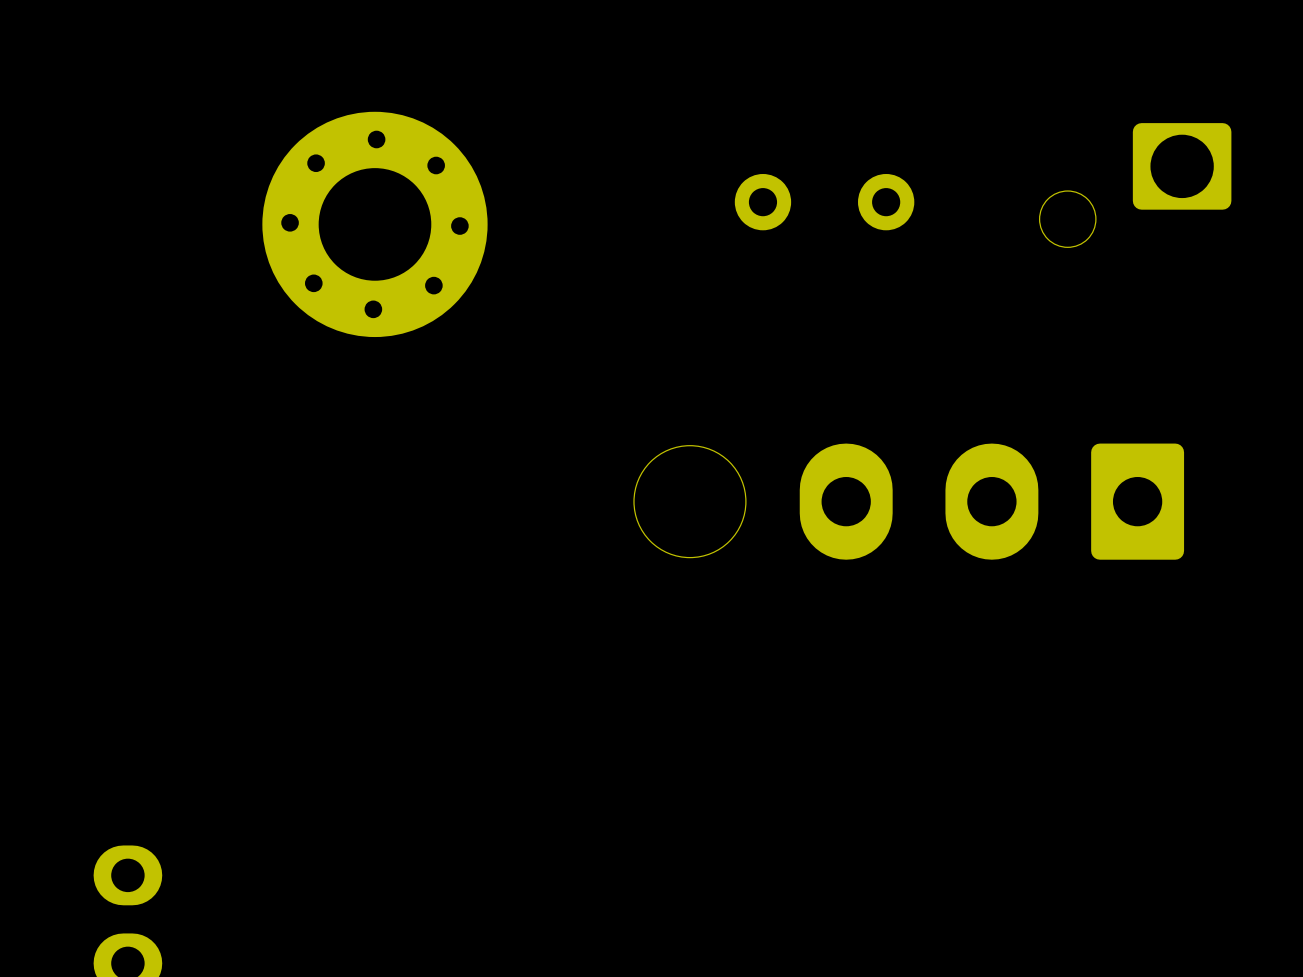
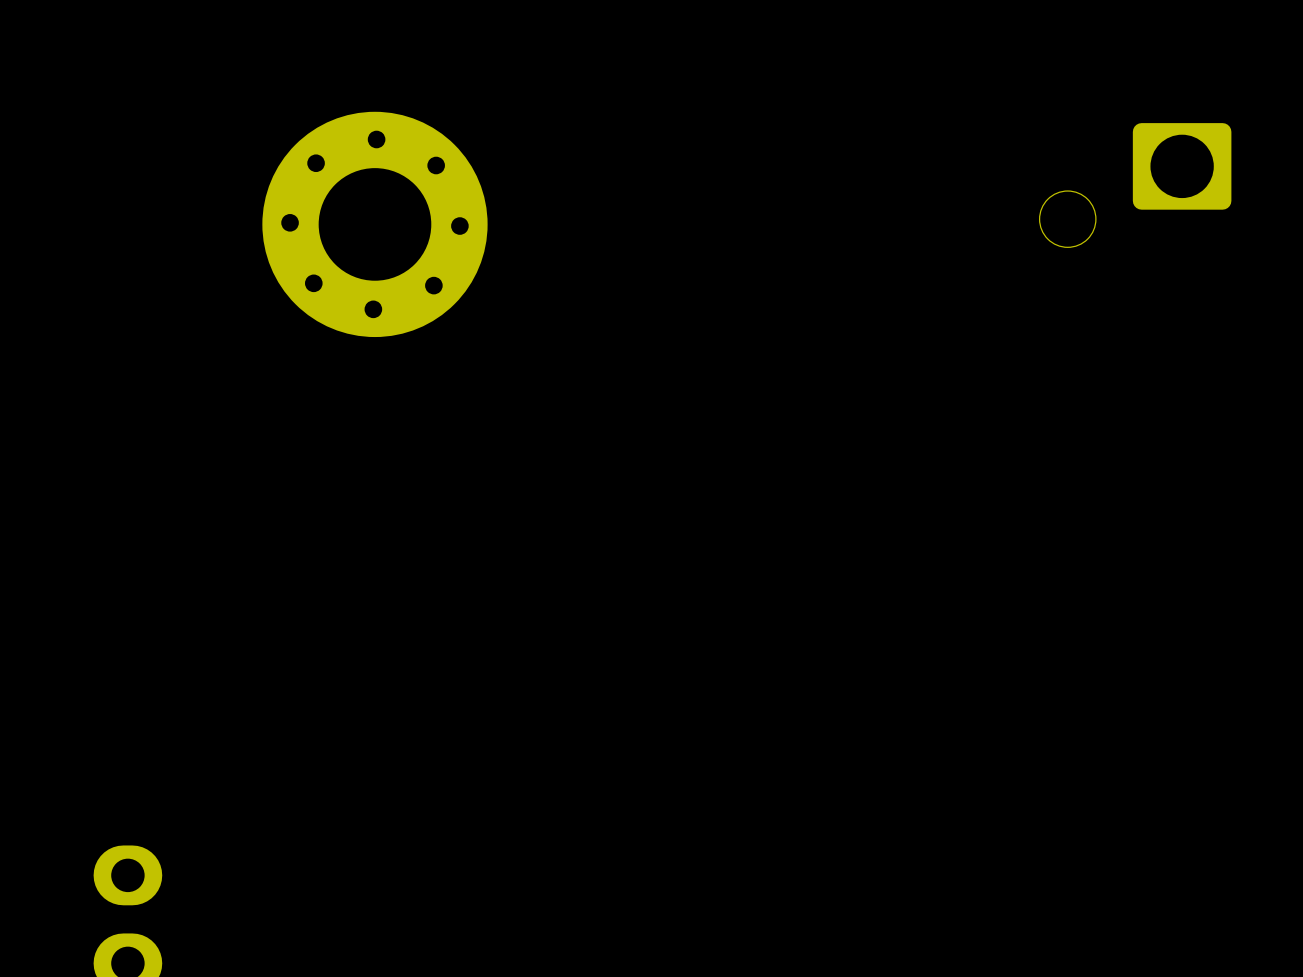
part: (824, 202) -> none
part: (909, 501) -> none

